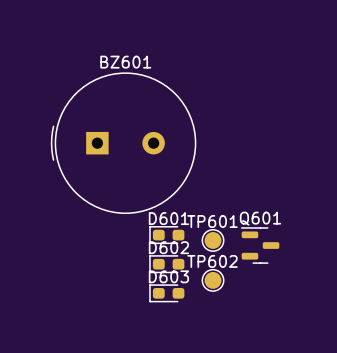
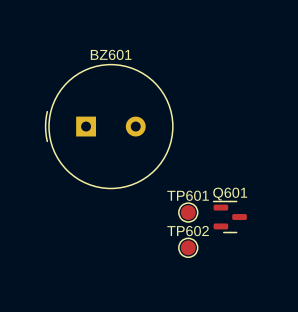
D601: (166, 235) -> none
D602: (166, 264) -> none
D603: (166, 293) -> none

